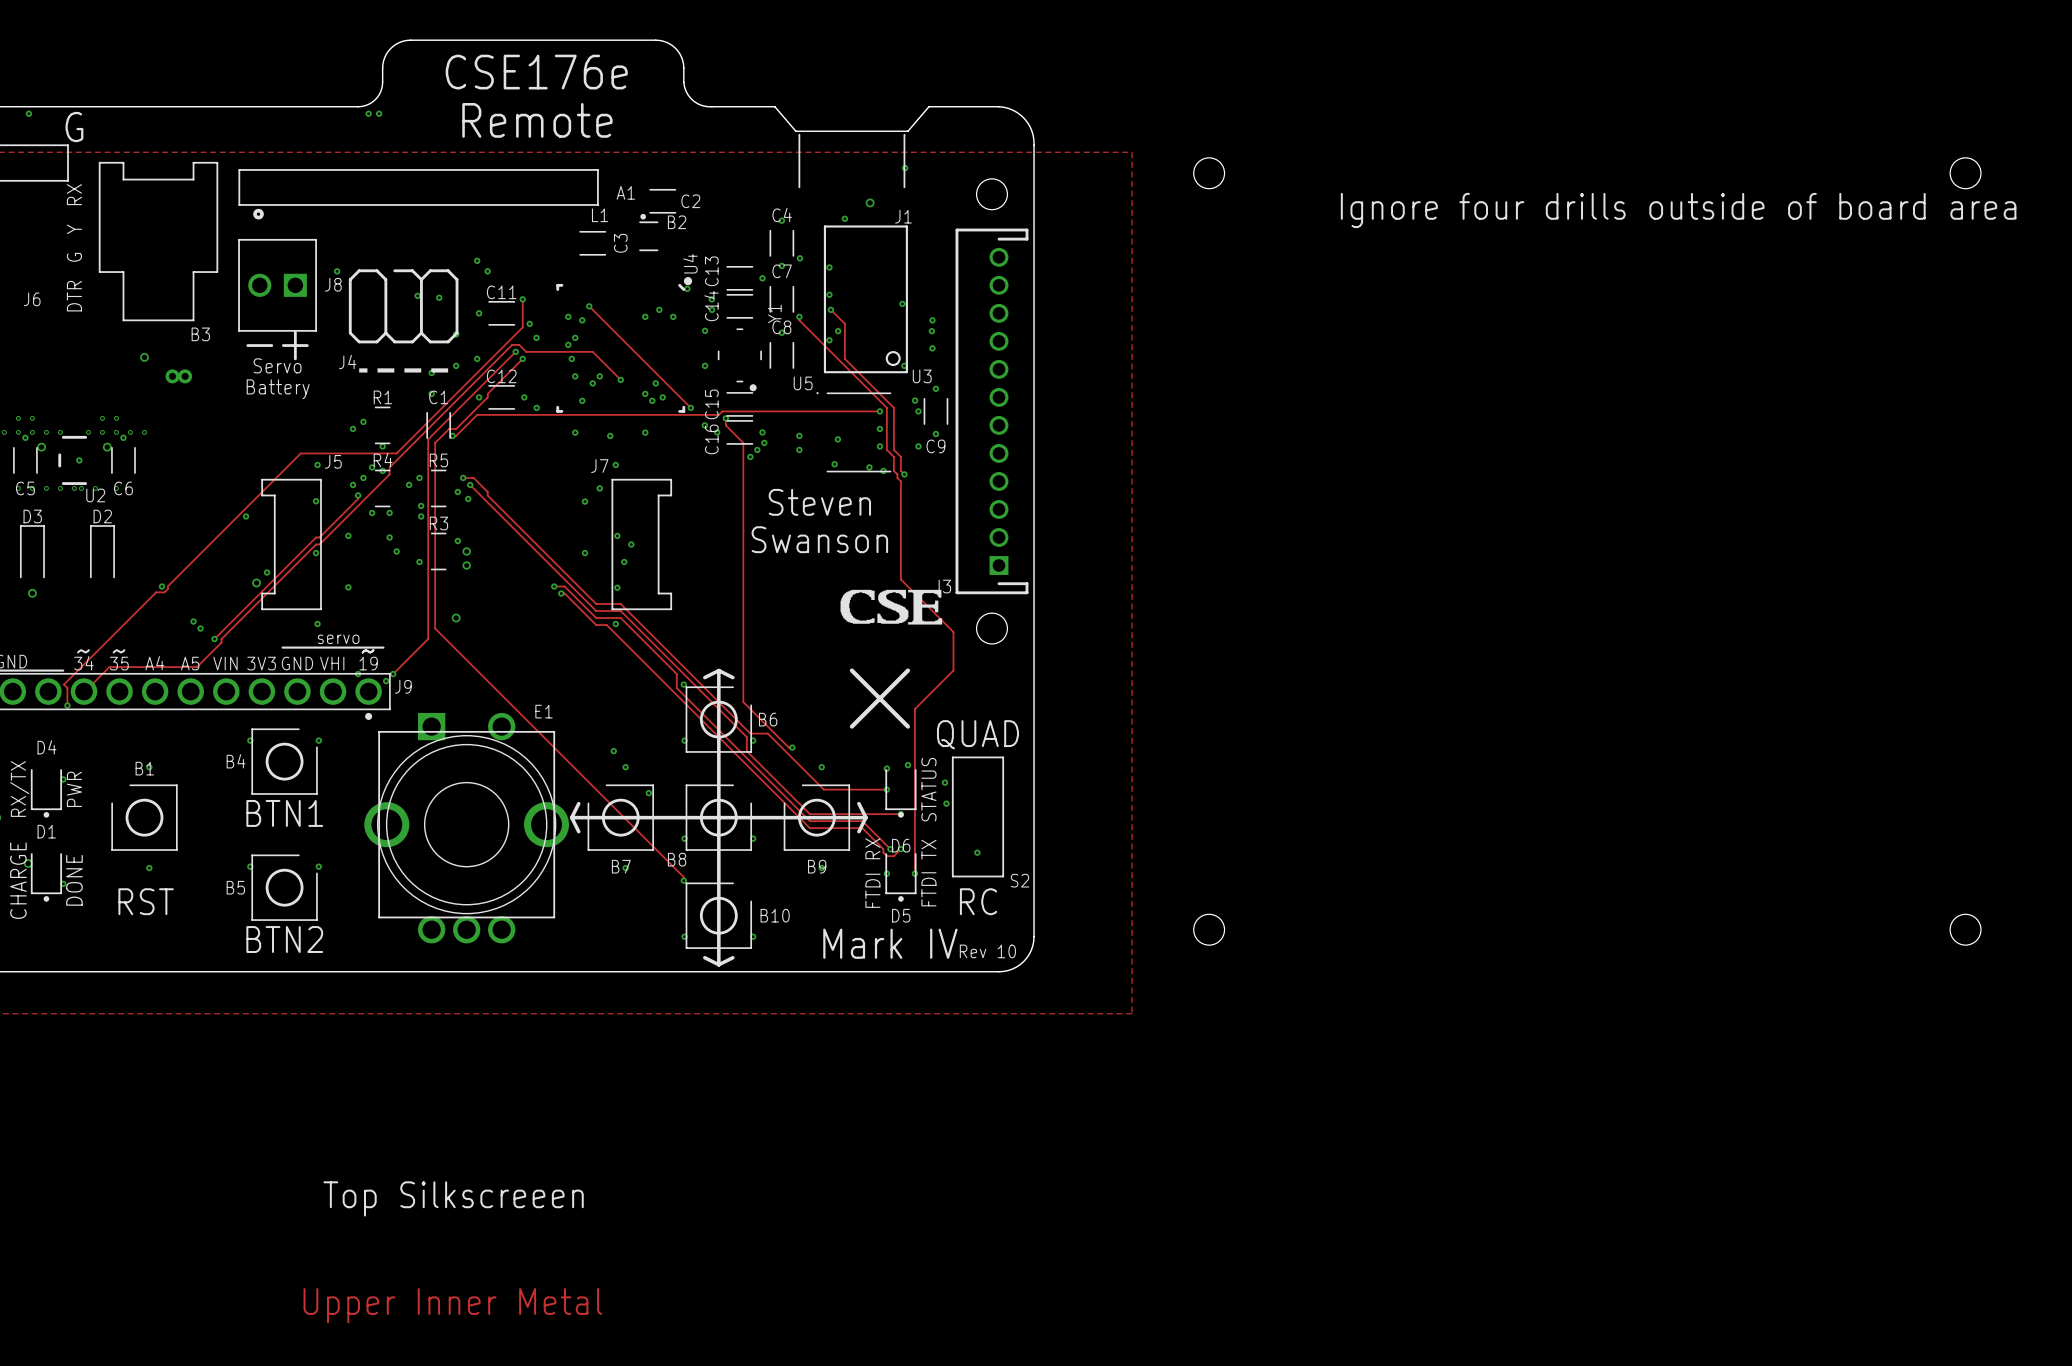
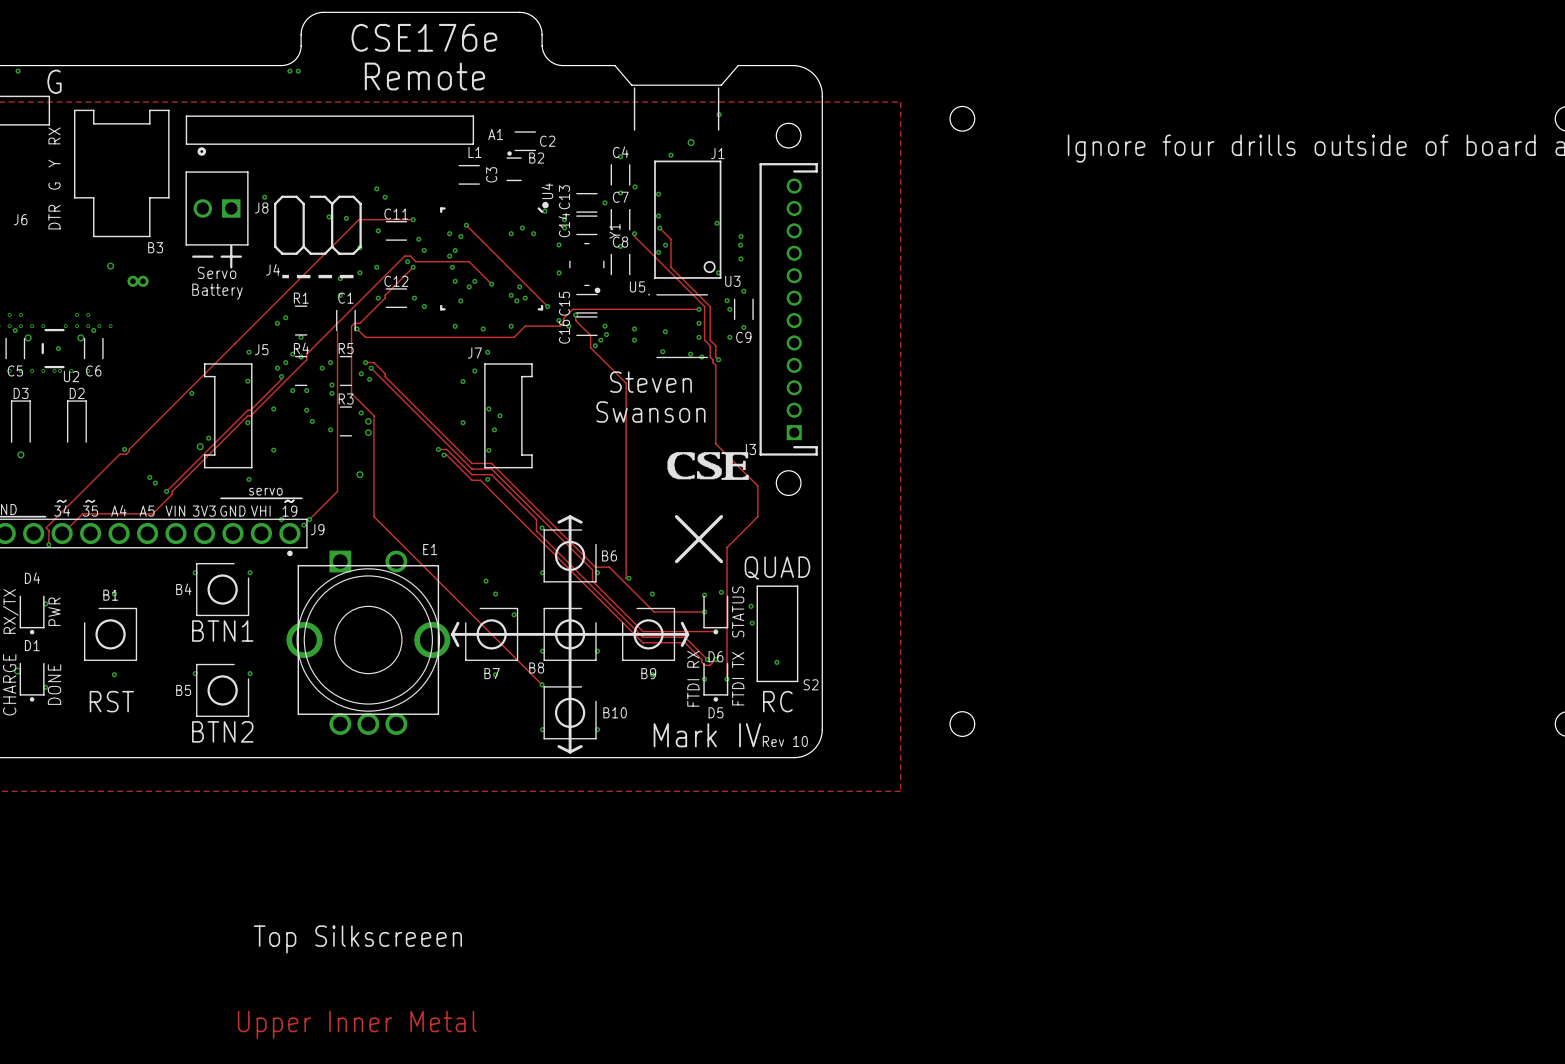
track: (522, 299) (522, 327) (396, 453) (300, 453) -> (413, 219) (358, 219) (235, 342)
track: (515, 351) (428, 439) -> none
track: (718, 414) (477, 414) (456, 435) (452, 435) -> (570, 312) (559, 326) (525, 326) (514, 337) (365, 337) (357, 328)
track: (445, 432) (435, 442) (435, 628) (683, 877) -> (351, 326) (351, 393) (373, 415) (373, 516) (542, 684)
track: (743, 442) (743, 702) (788, 747) -> (589, 334) (590, 347) (626, 383) (626, 578)

